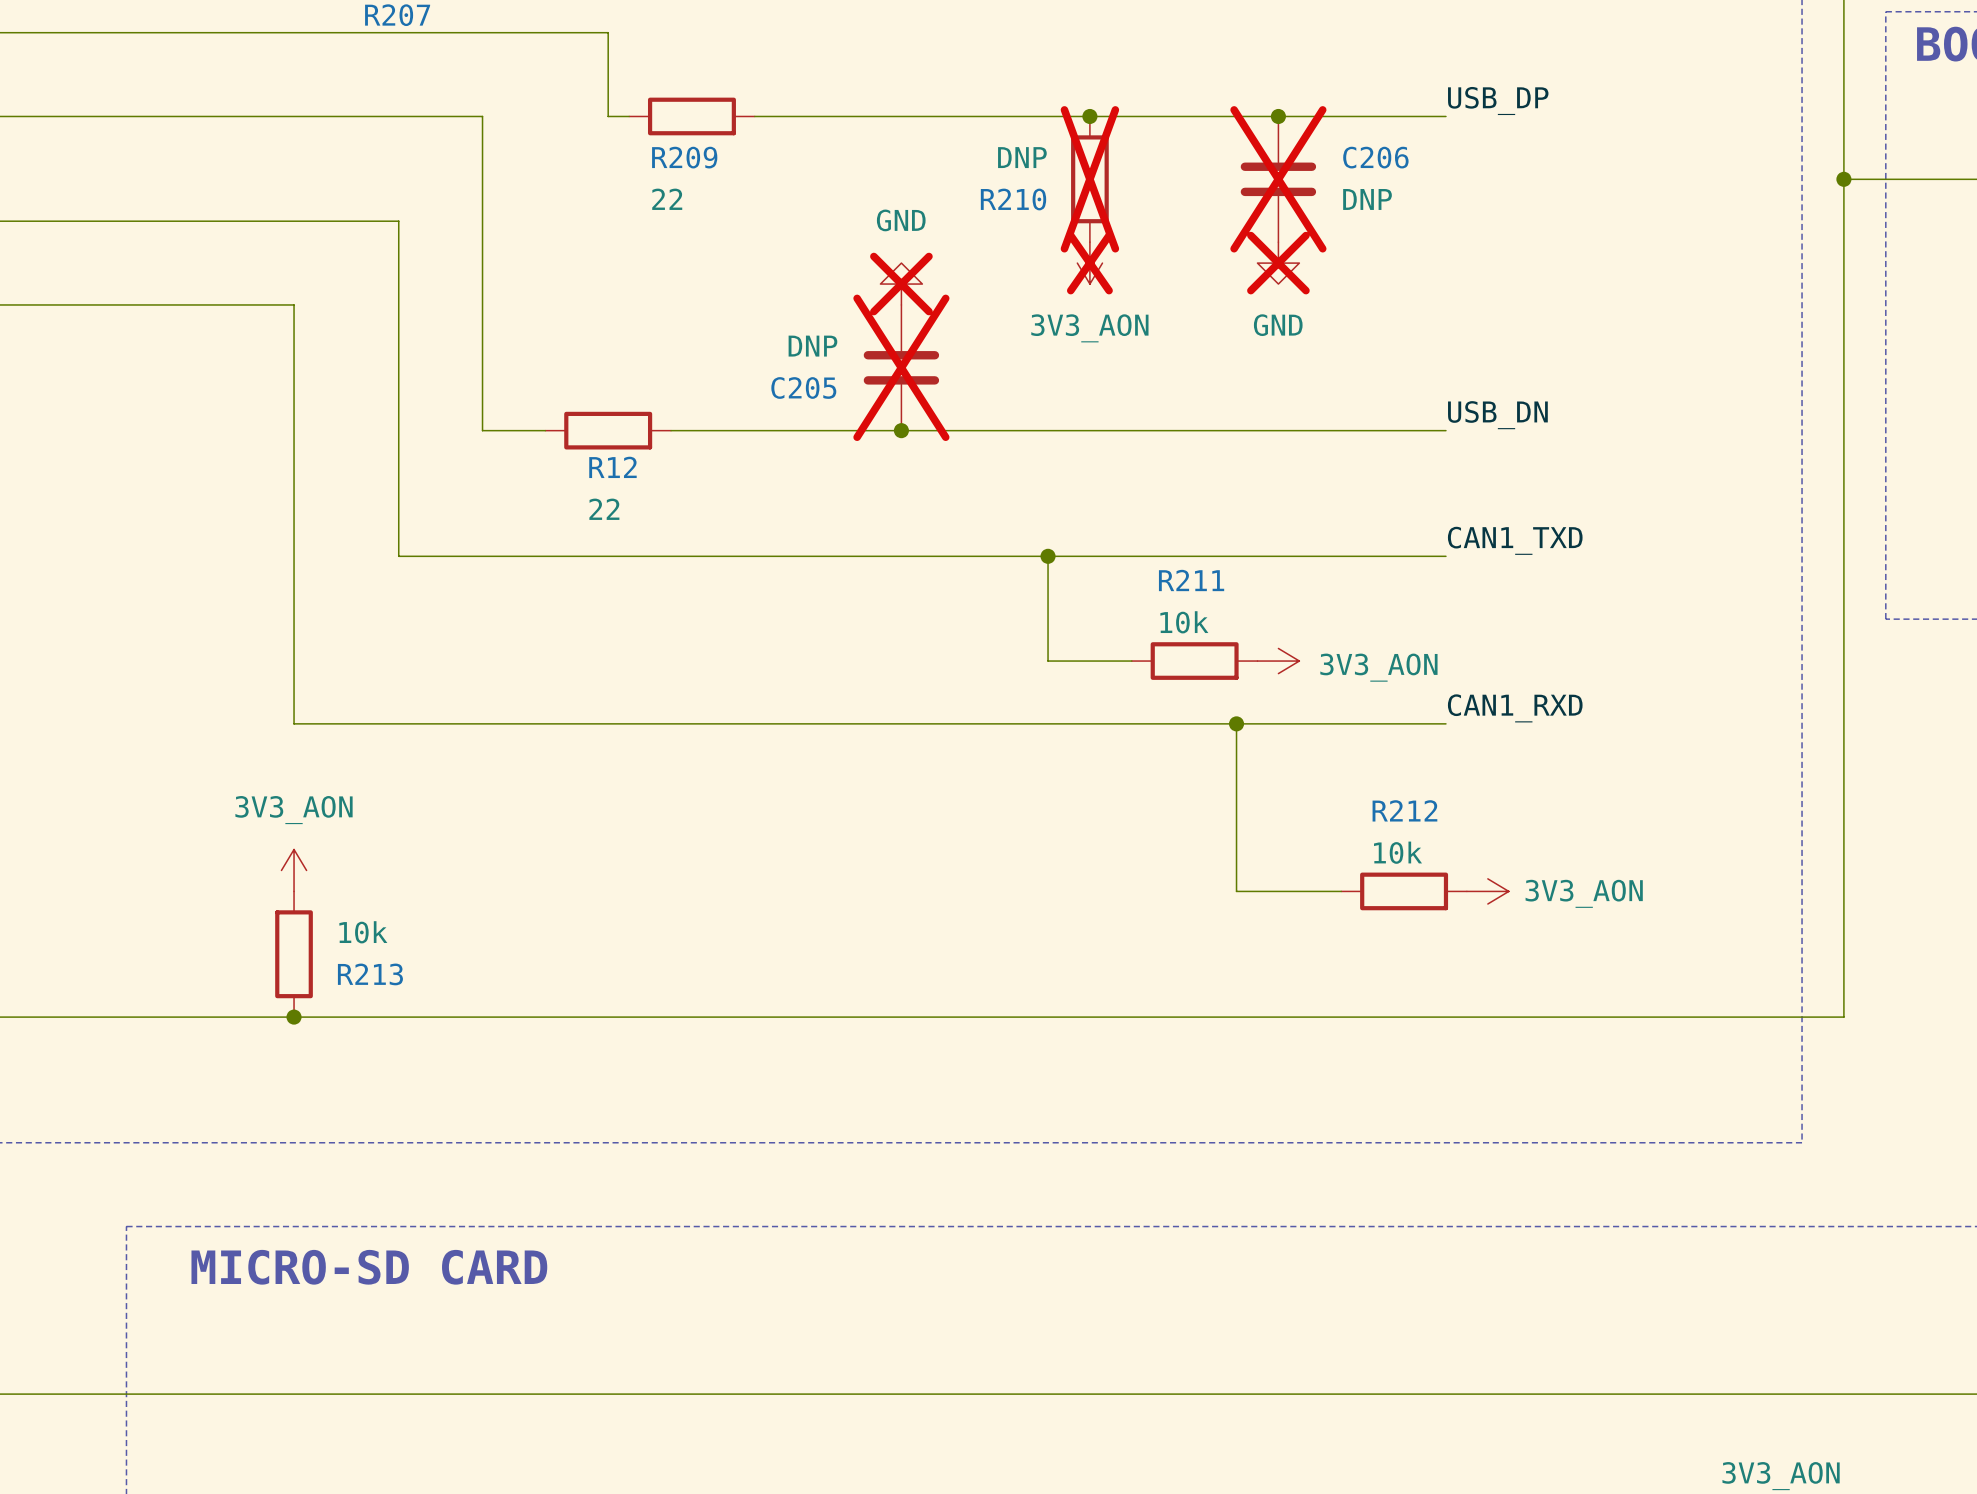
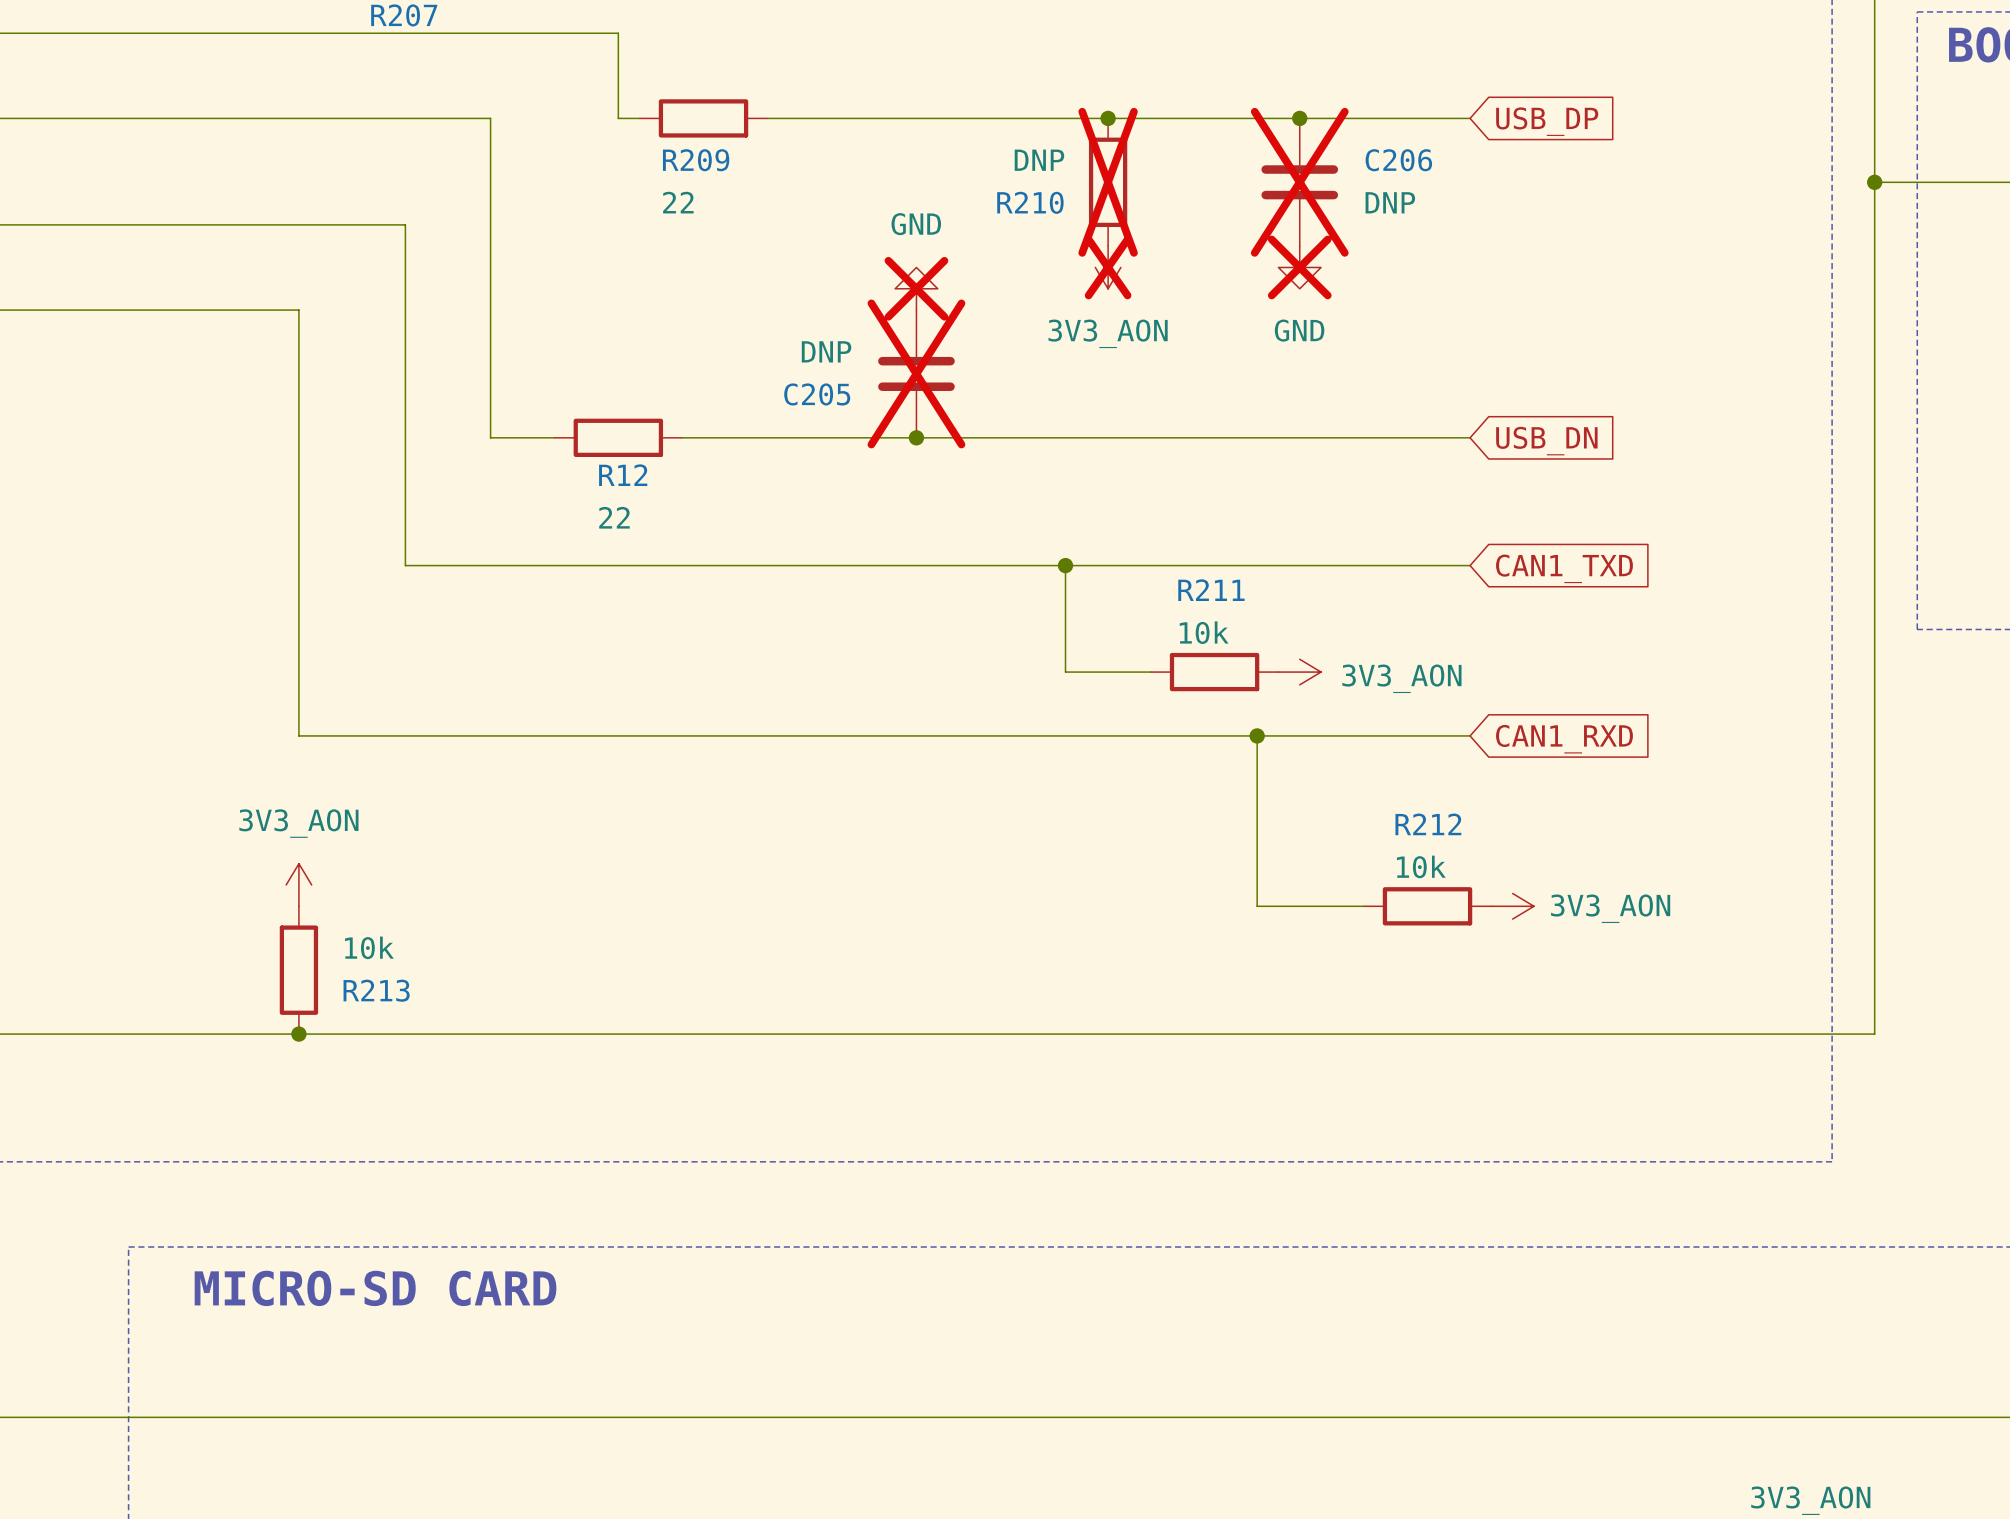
label: USB_DP (1498, 100) -> none
global label: none -> USB_DP (1547, 121)
label: USB_DN (1497, 415) -> none
global label: none -> USB_DN (1546, 441)
label: CAN1_TXD (1515, 540) -> none
global label: none -> CAN1_TXD (1564, 568)
label: CAN1_RXD (1515, 708) -> none
global label: none -> CAN1_RXD (1564, 739)

